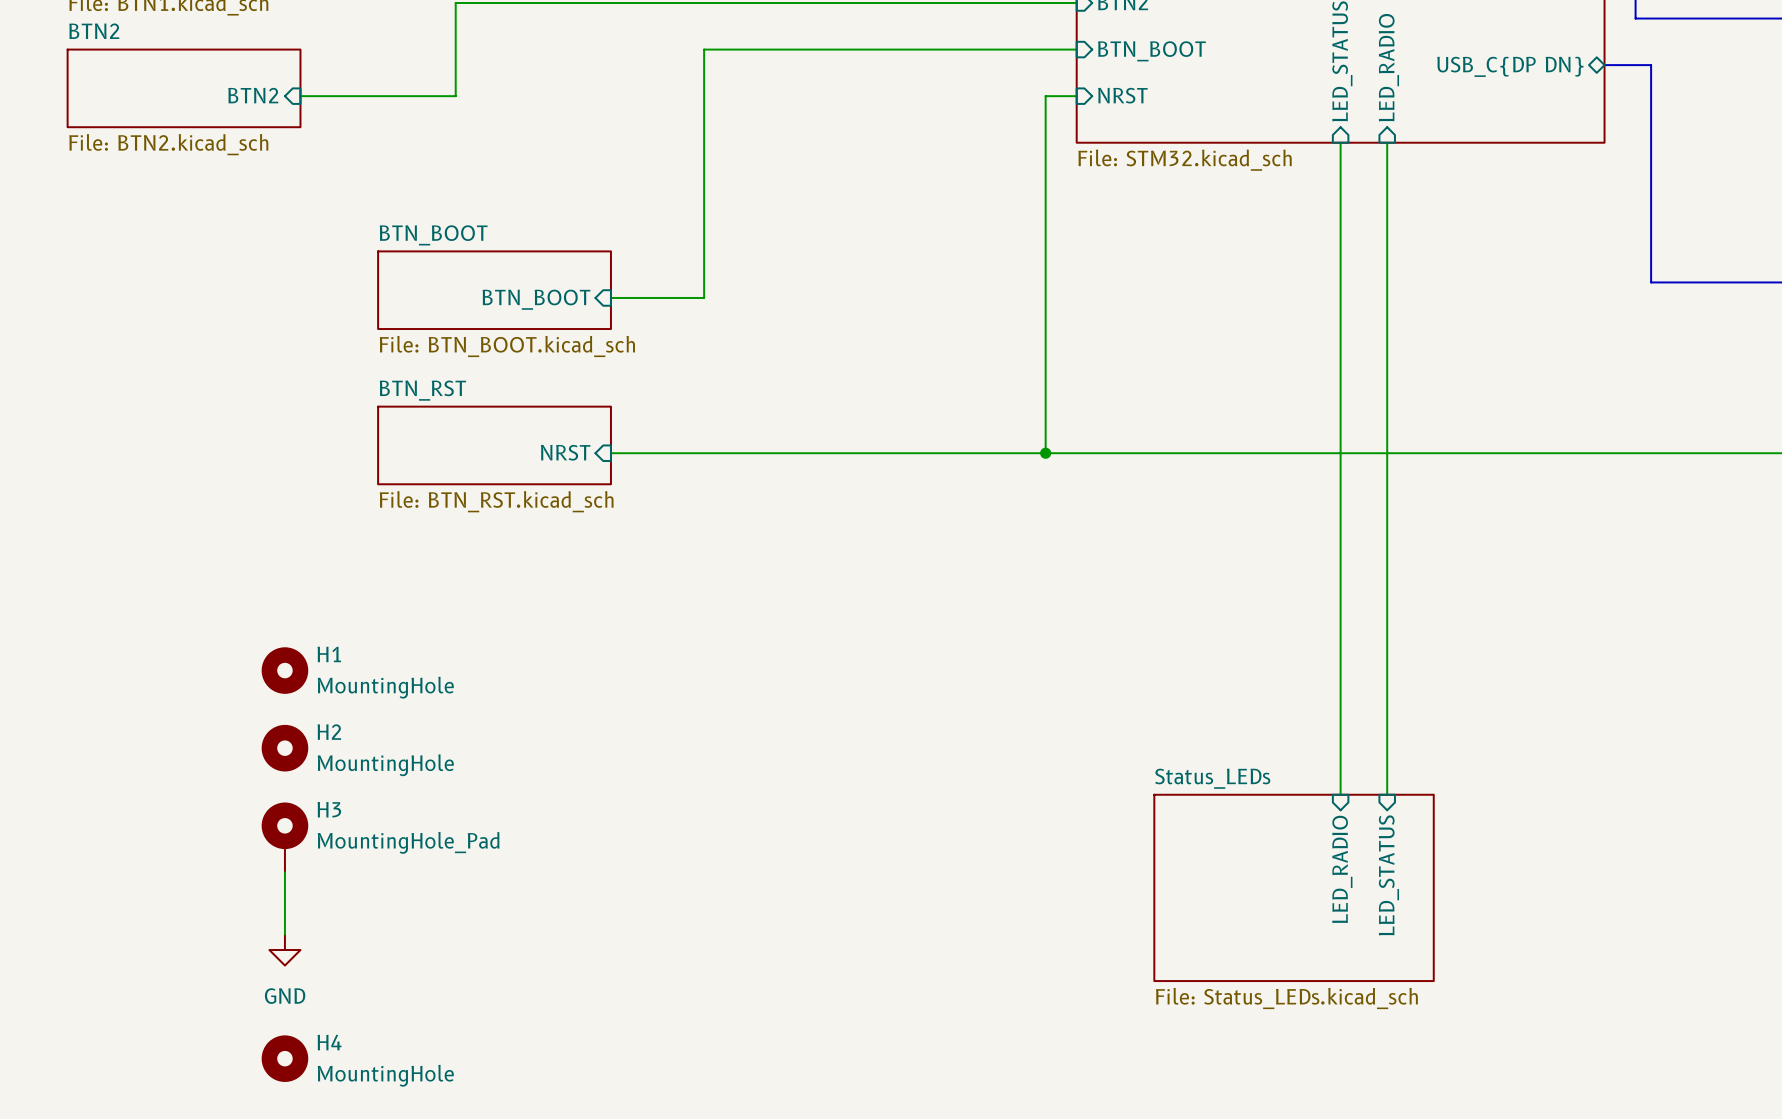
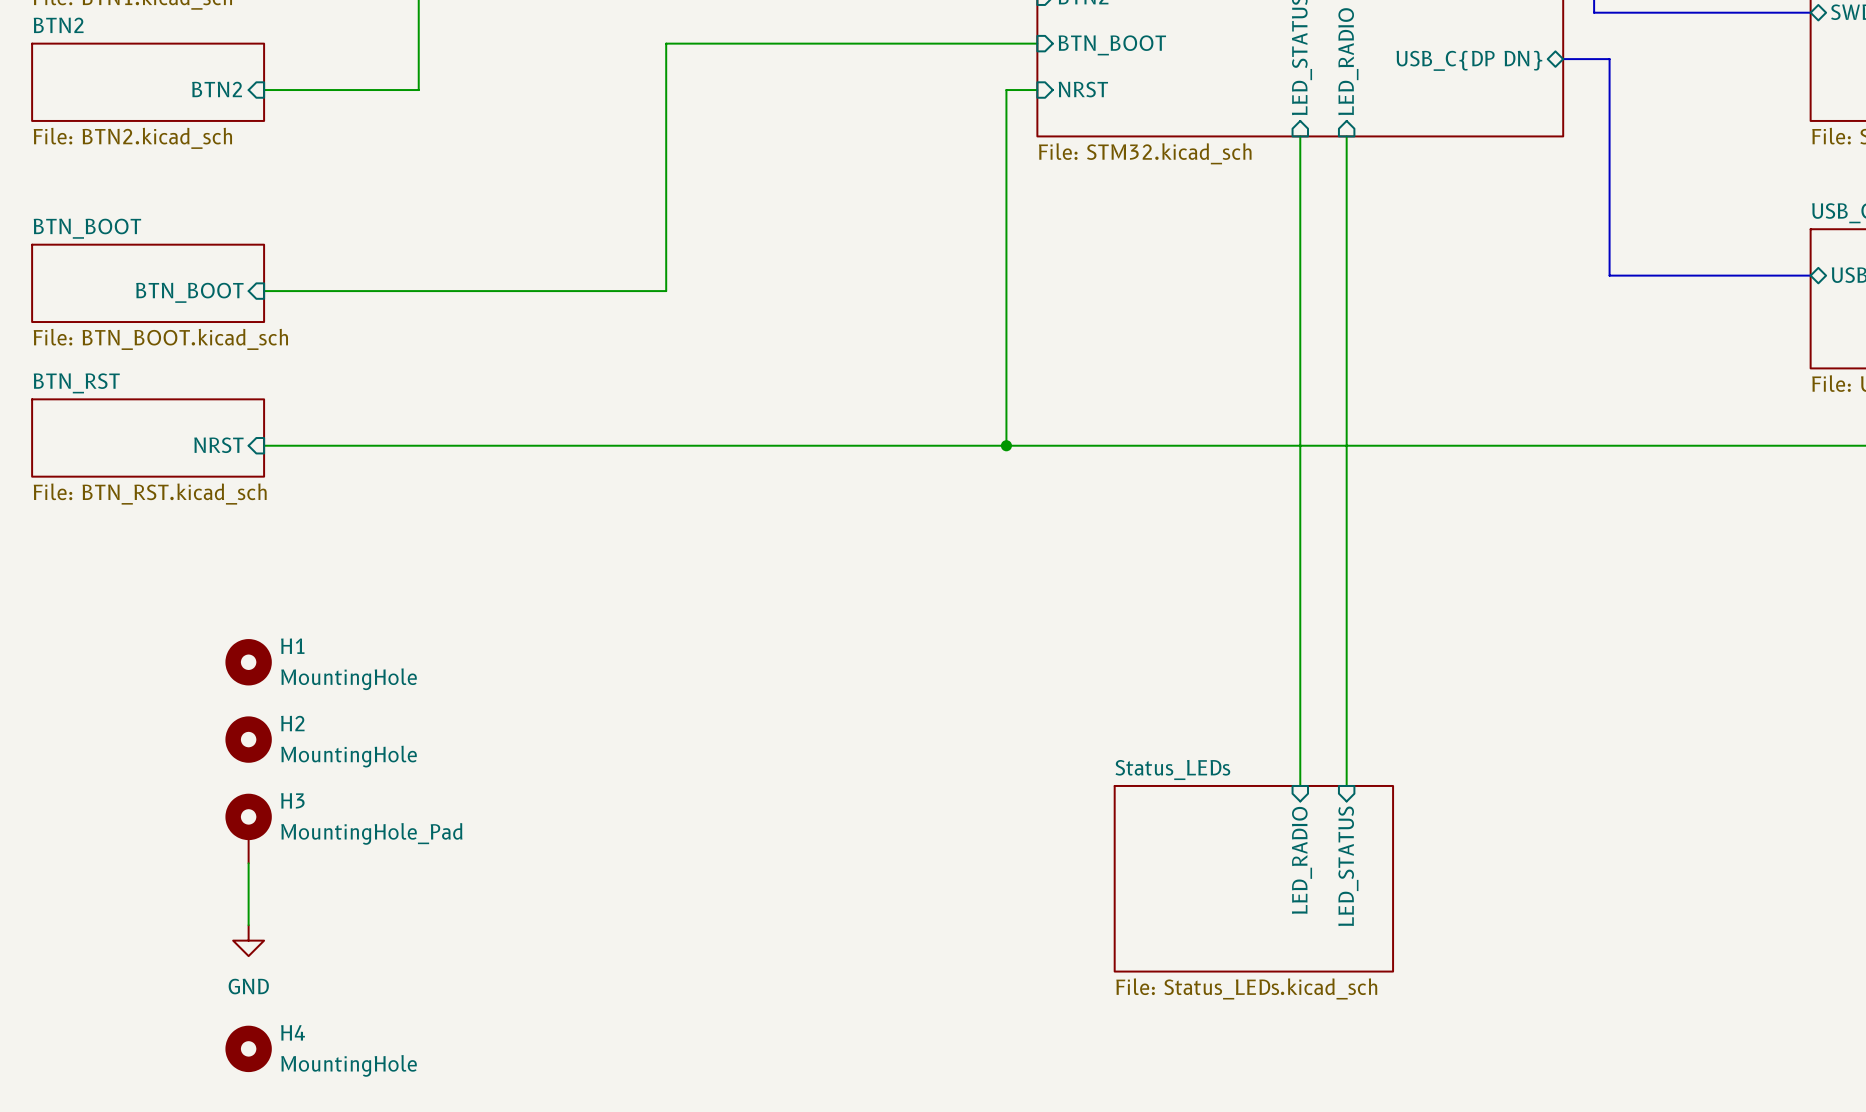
sheet BTN_BOOT: none -> File: BTN_BOOT.kicad_sch (148, 283)
sheet BTN_BOOT: File: BTN_BOOT.kicad_sch (494, 290) -> none
wire: none -> (264, 291) (573, 291)
sheet pin: none -> BTN_BOOT (189, 292)
sheet pin: BTN_BOOT (536, 299) -> none
sheet BTN_RST: none -> File: BTN_RST.kicad_sch (148, 438)
sheet BTN_RST: File: BTN_RST.kicad_sch (494, 445) -> none
sheet pin: none -> NRST (218, 445)
sheet pin: NRST (565, 452) -> none
wire: none -> (264, 445) (573, 445)

